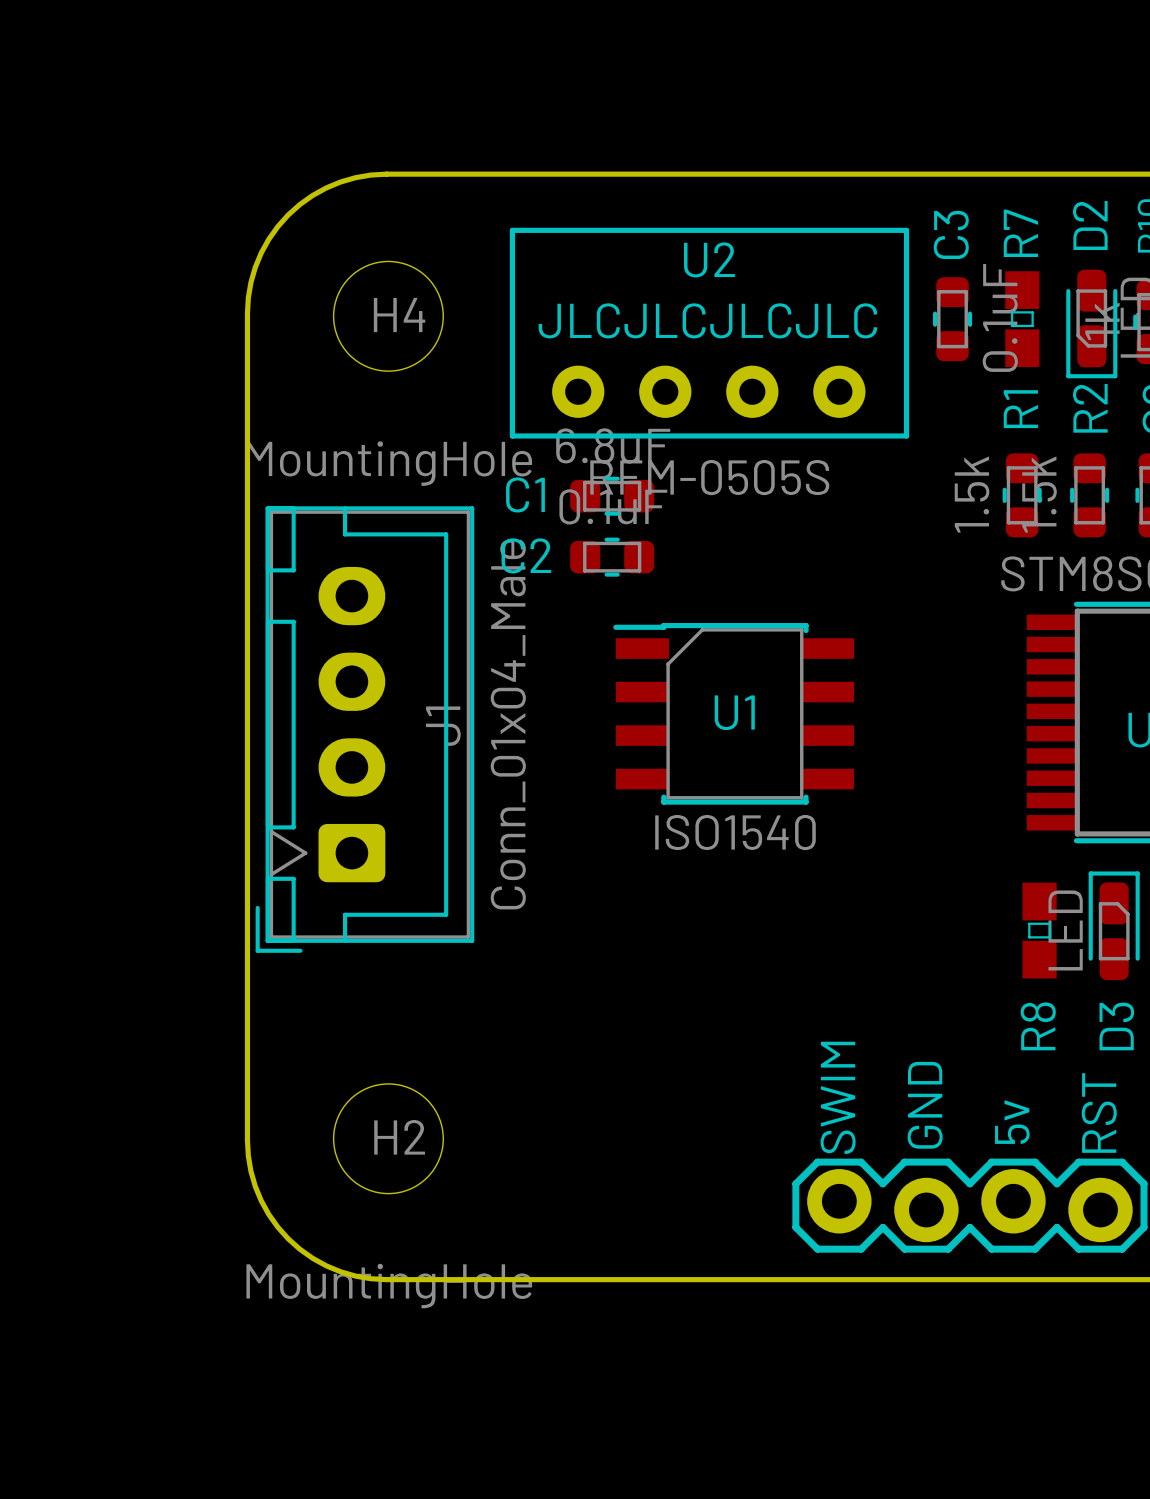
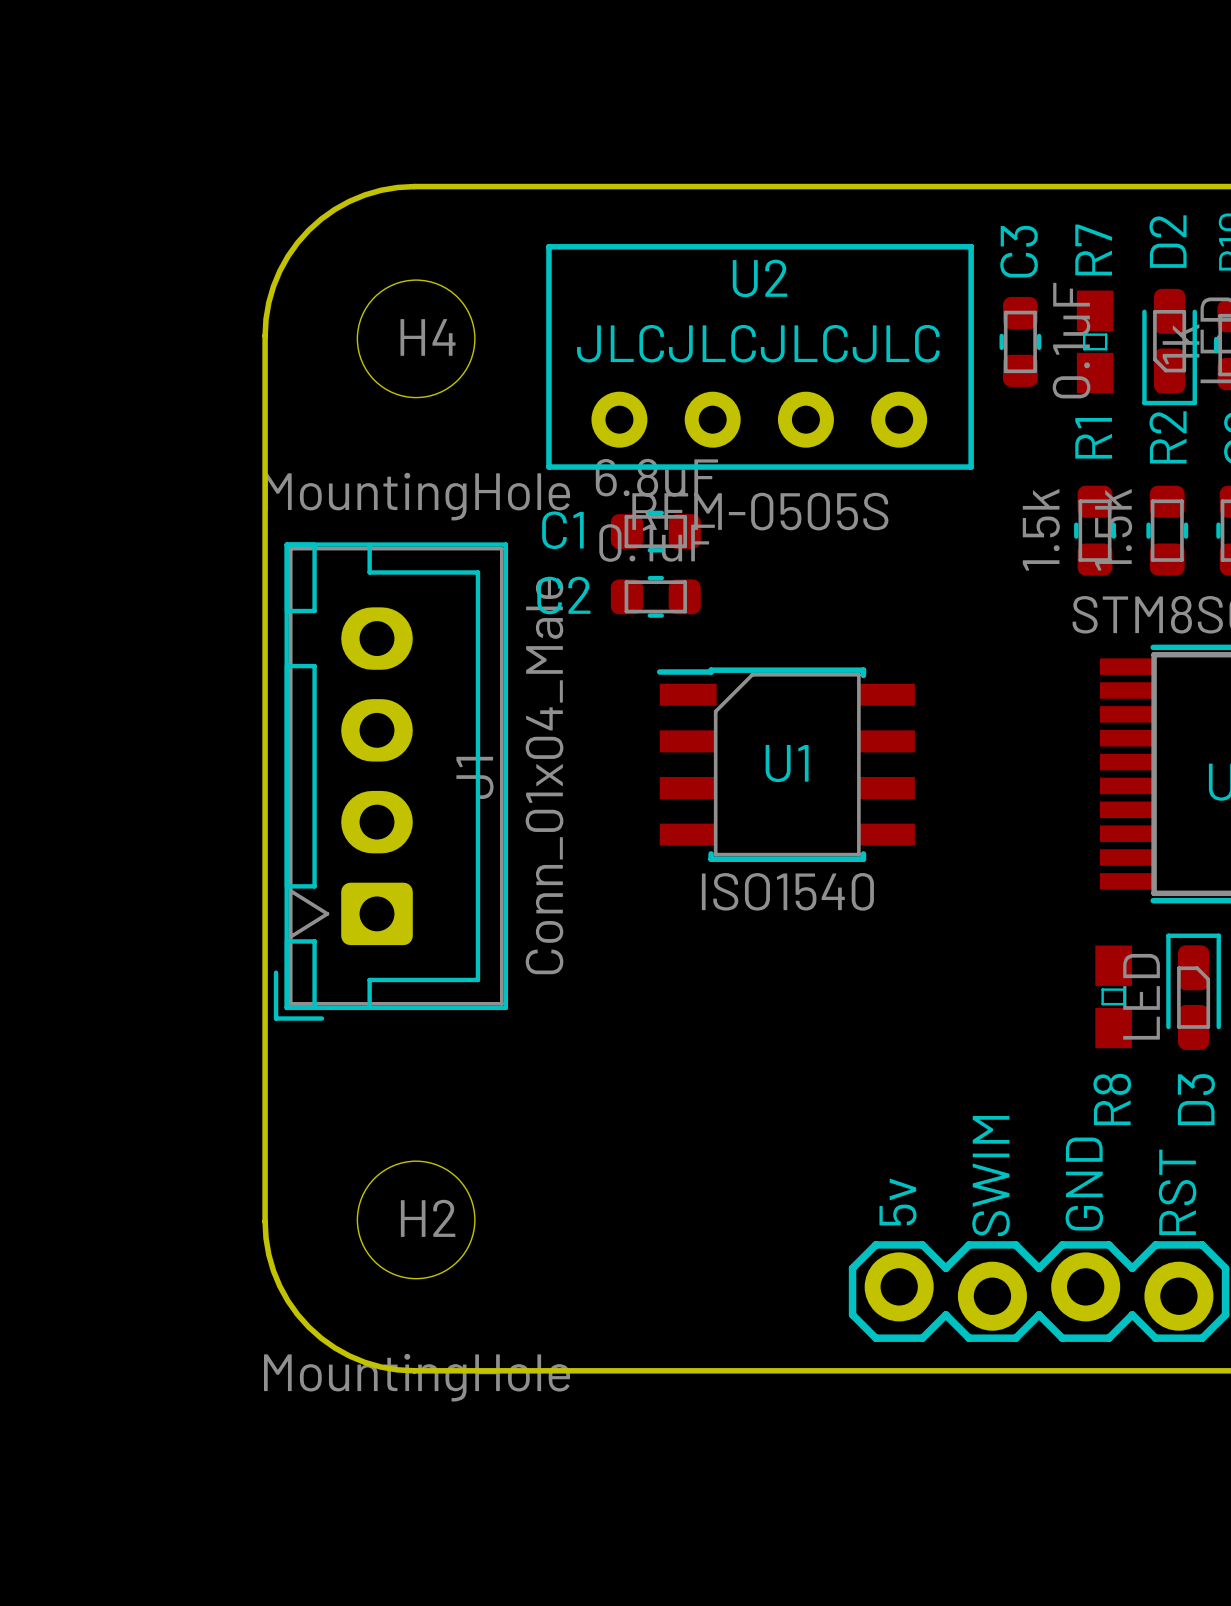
text: SWIM (838, 1097) -> 5v (897, 1201)
text: GND (925, 1105) -> SWIM (991, 1176)
text: 5v (1012, 1122) -> GND (1084, 1184)

